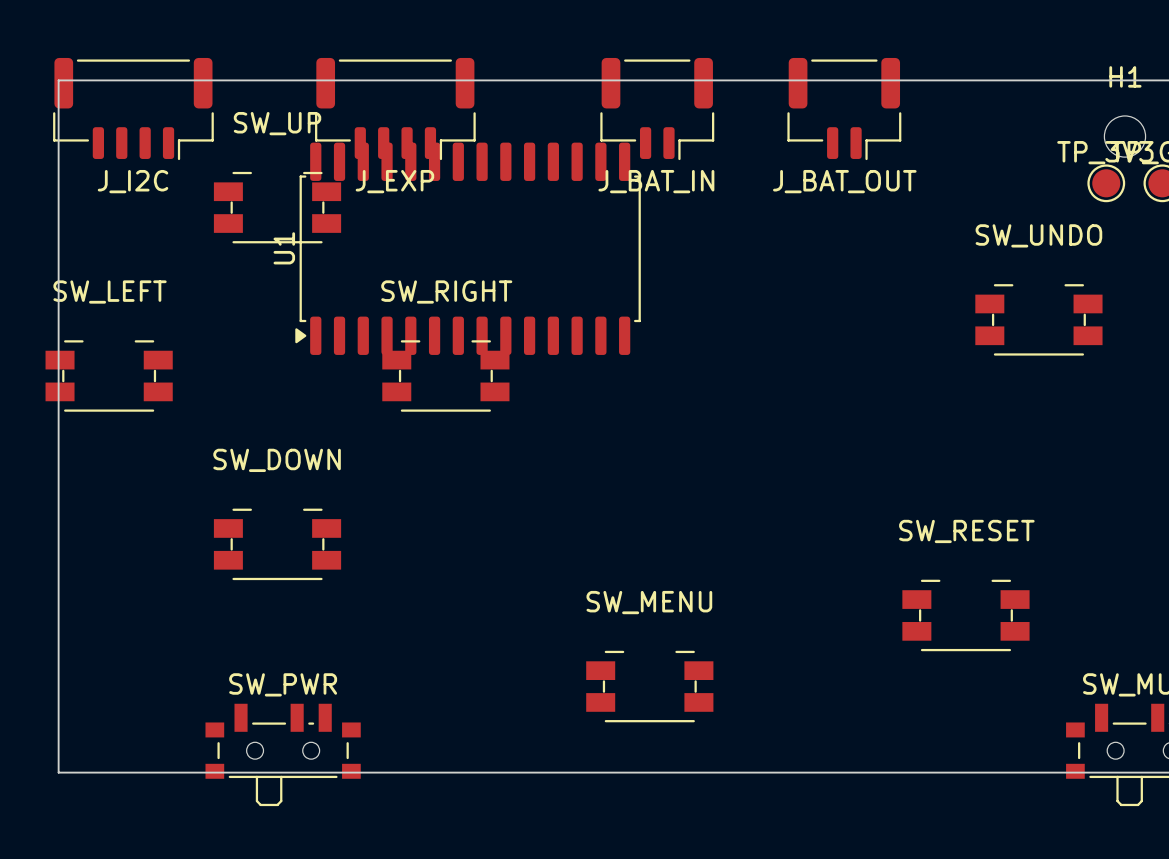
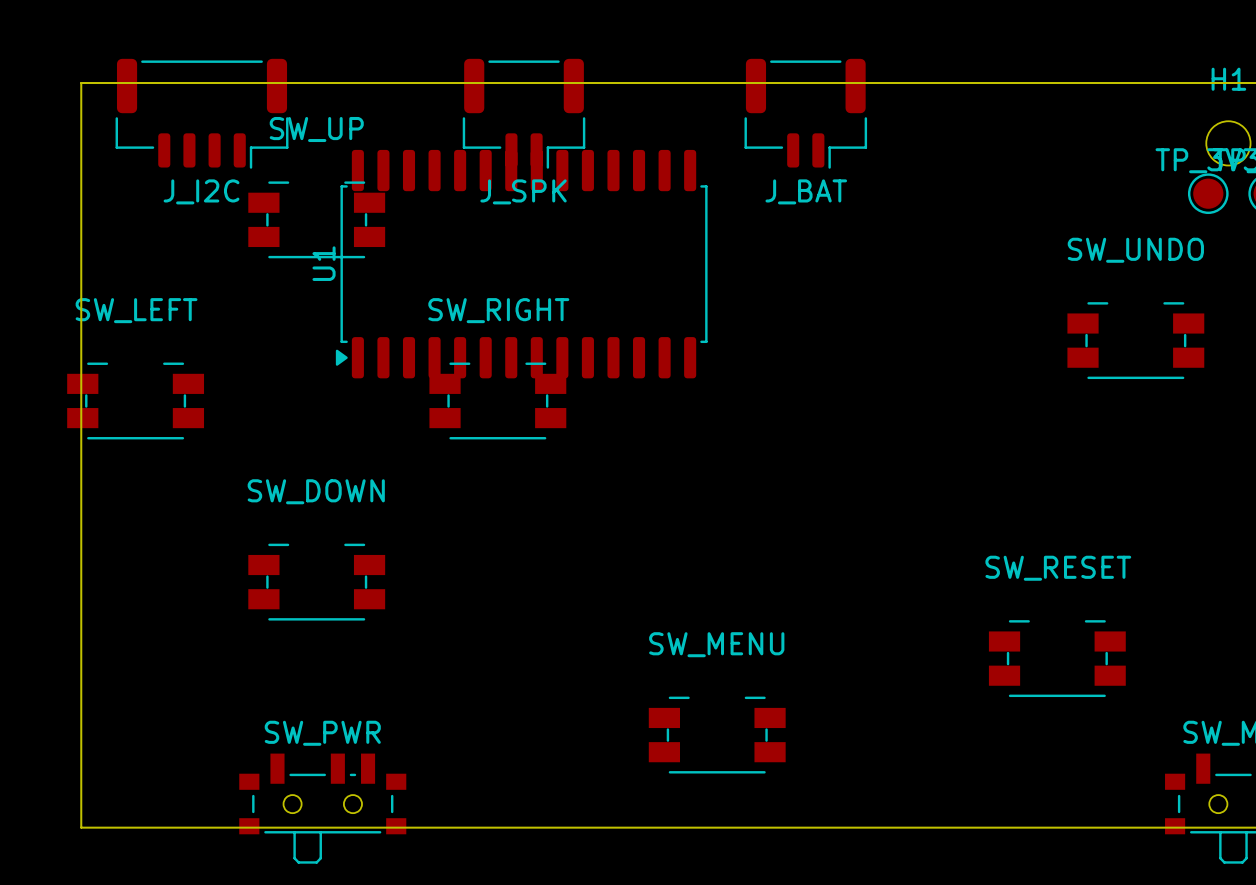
J_I2C position: (133, 109) -> (202, 113)
J_EXP: (395, 109) -> none
J_SPK: none -> (524, 113)
J_BAT_IN: (657, 109) -> none
J_BAT: none -> (805, 113)
J_BAT_OUT: (844, 109) -> none

